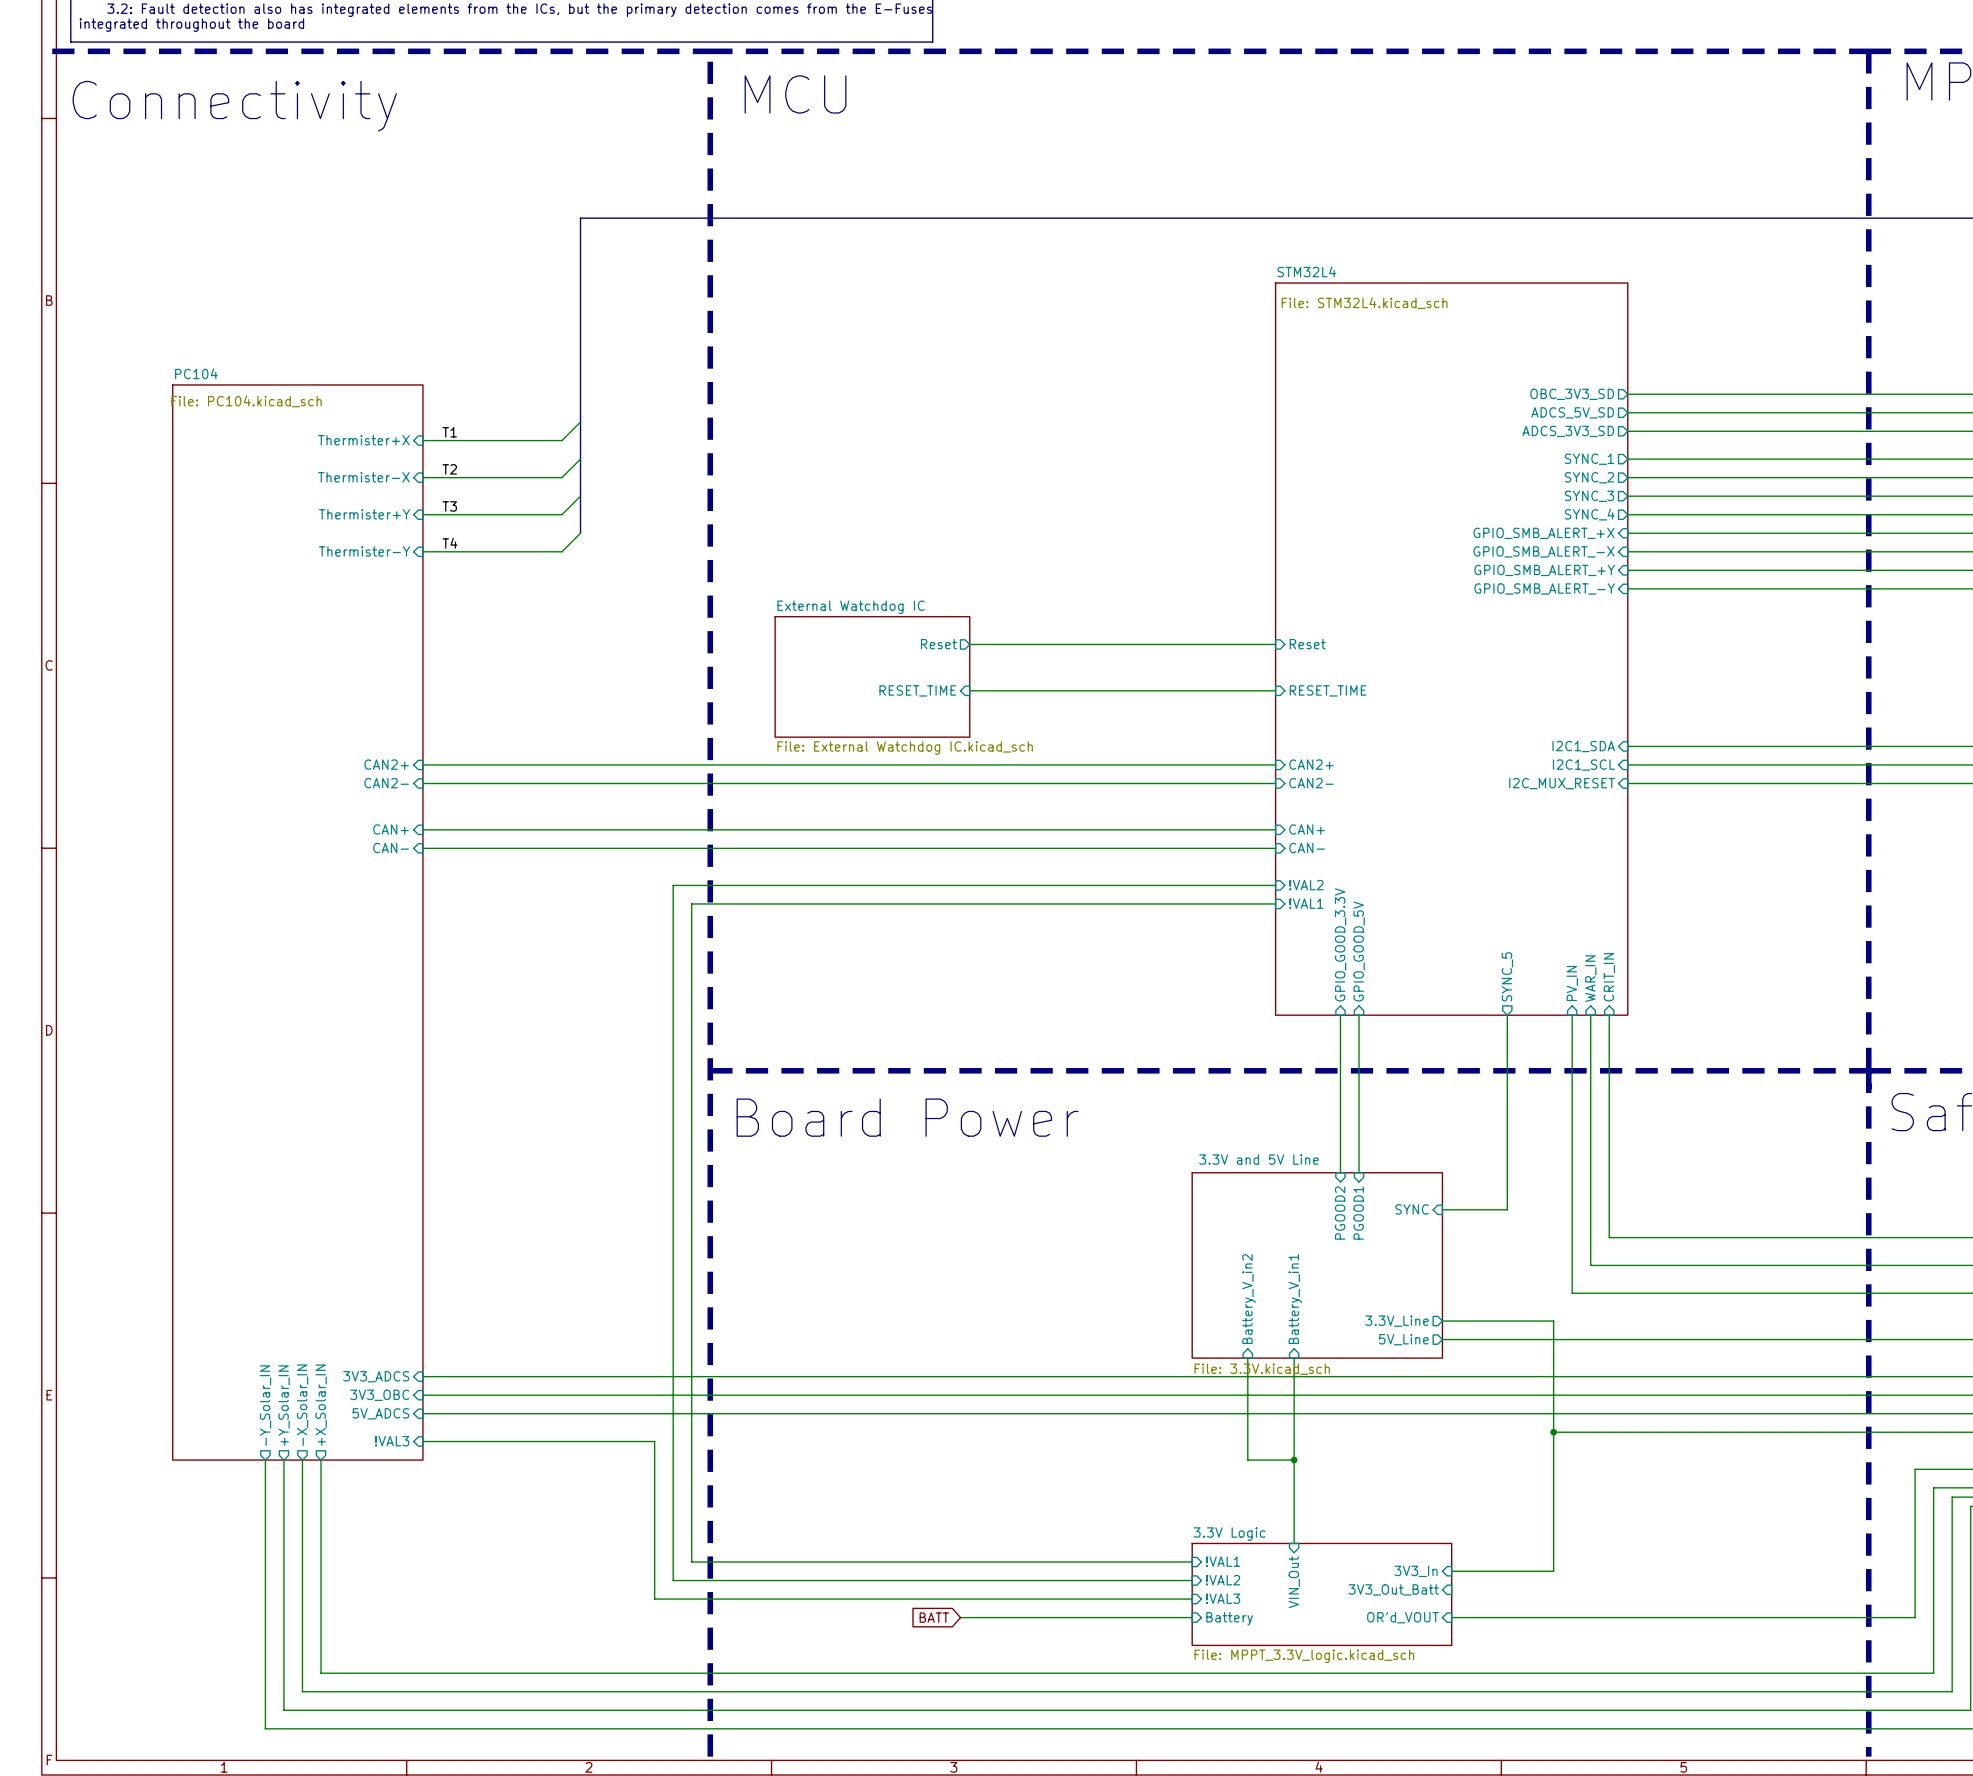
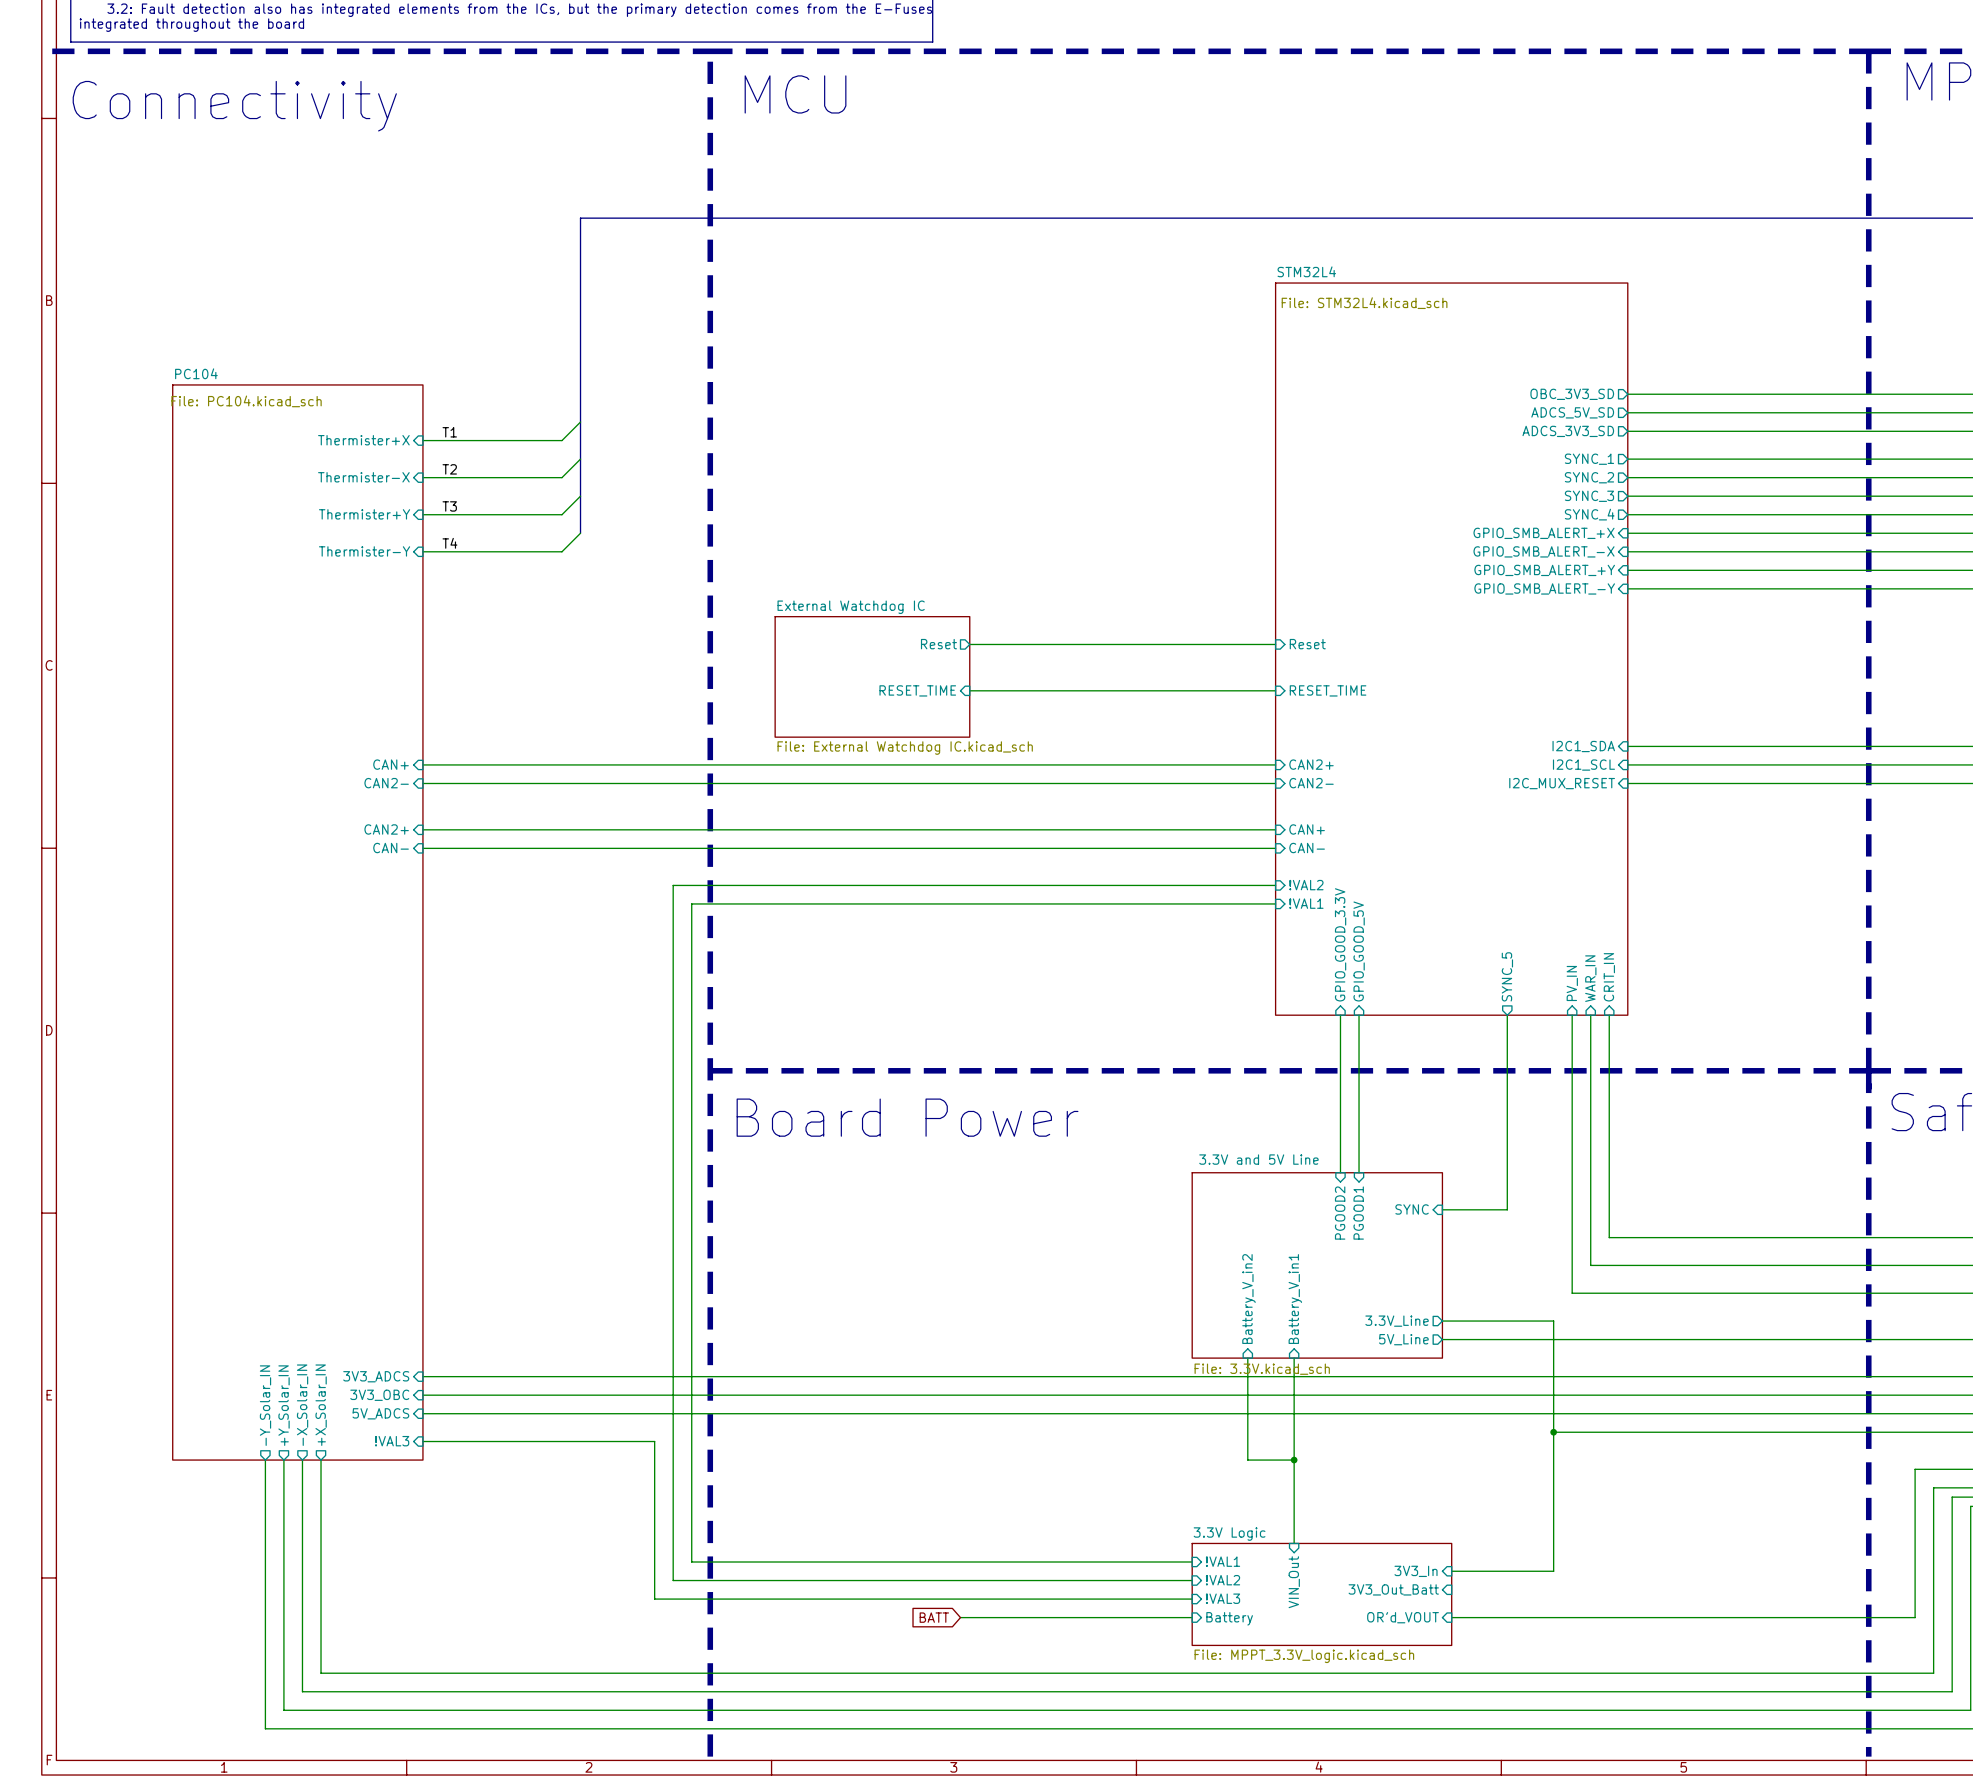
sheet pin: CAN2+ (386, 764) -> CAN+ (391, 764)
sheet pin: CAN+ (391, 829) -> CAN2+ (386, 829)

